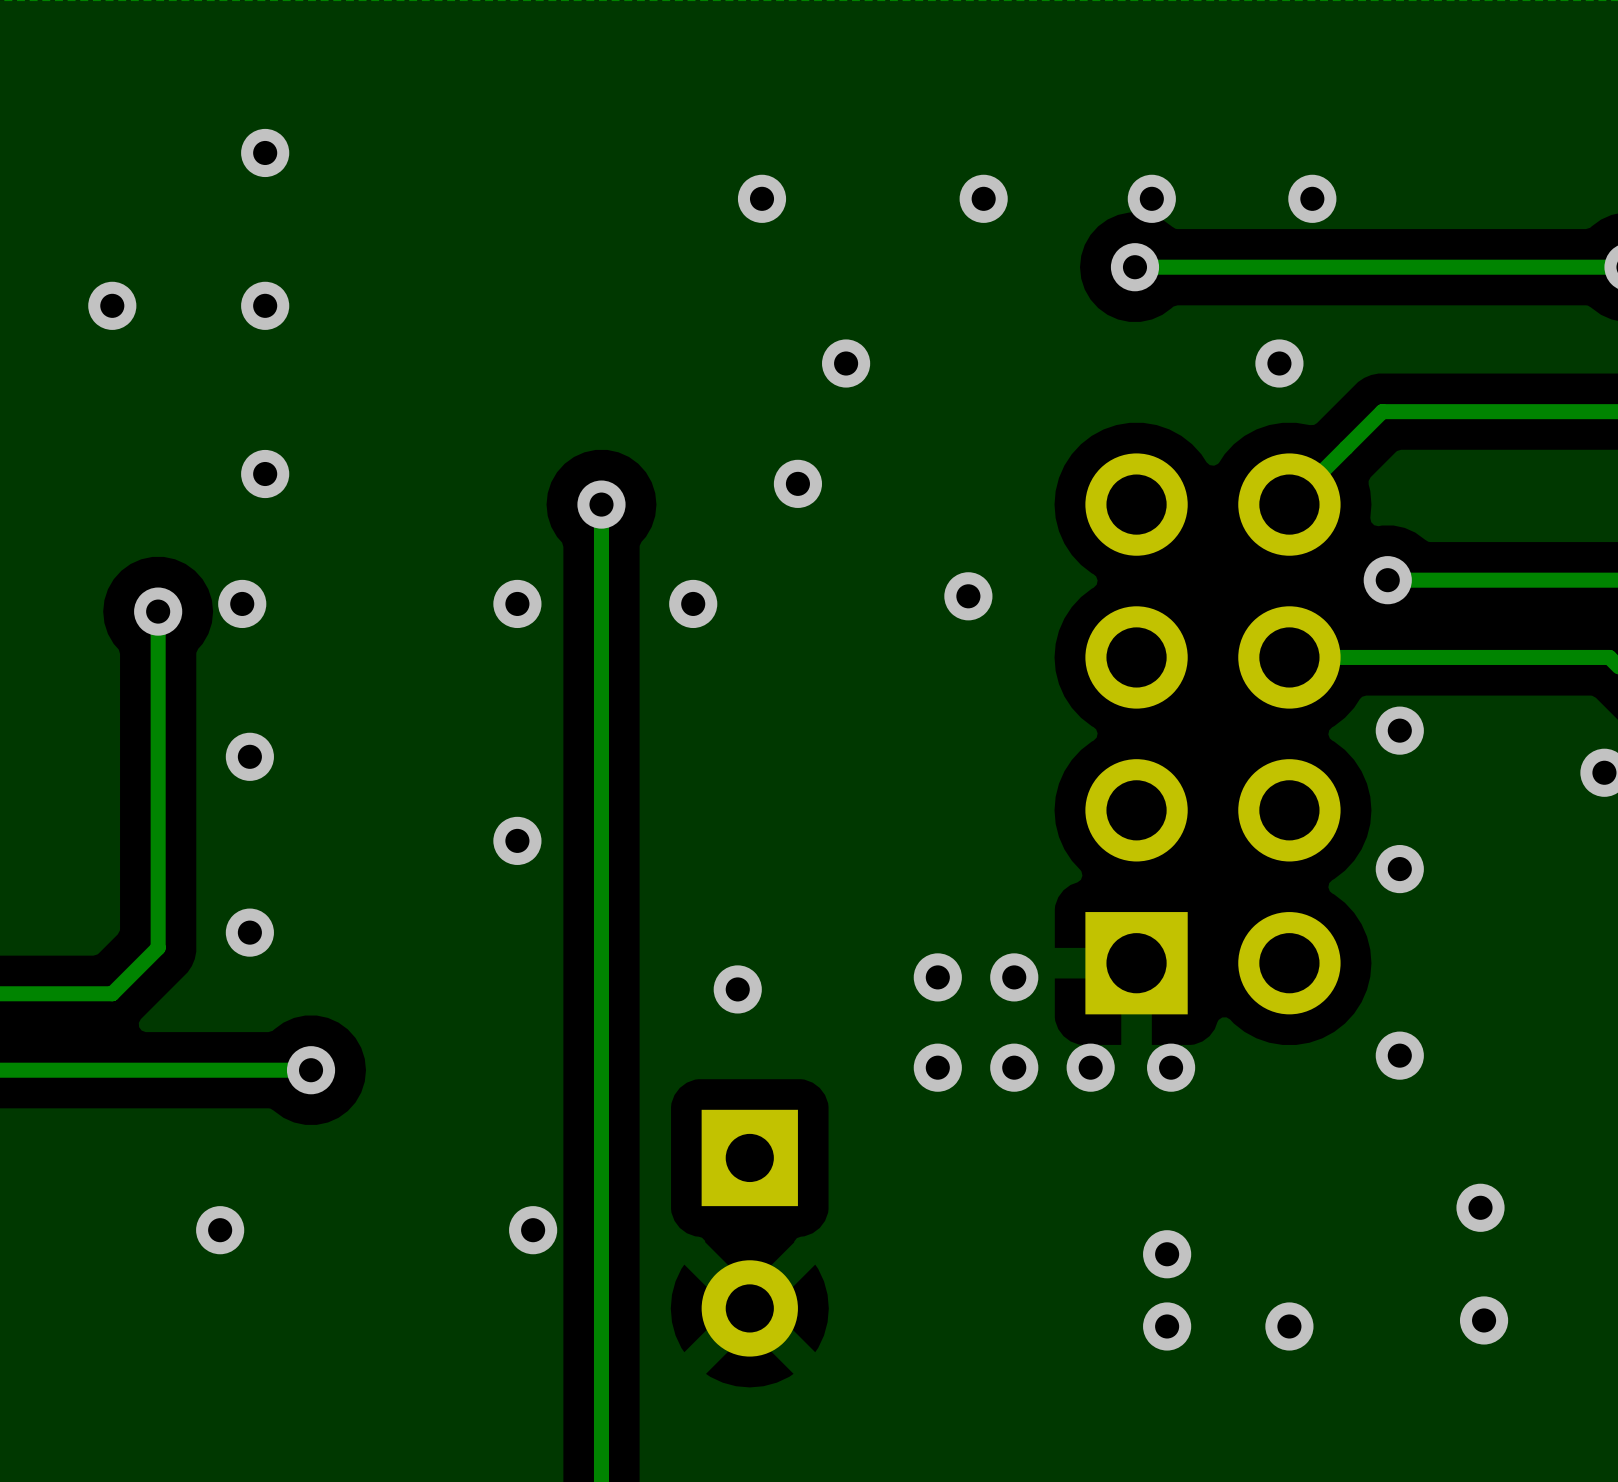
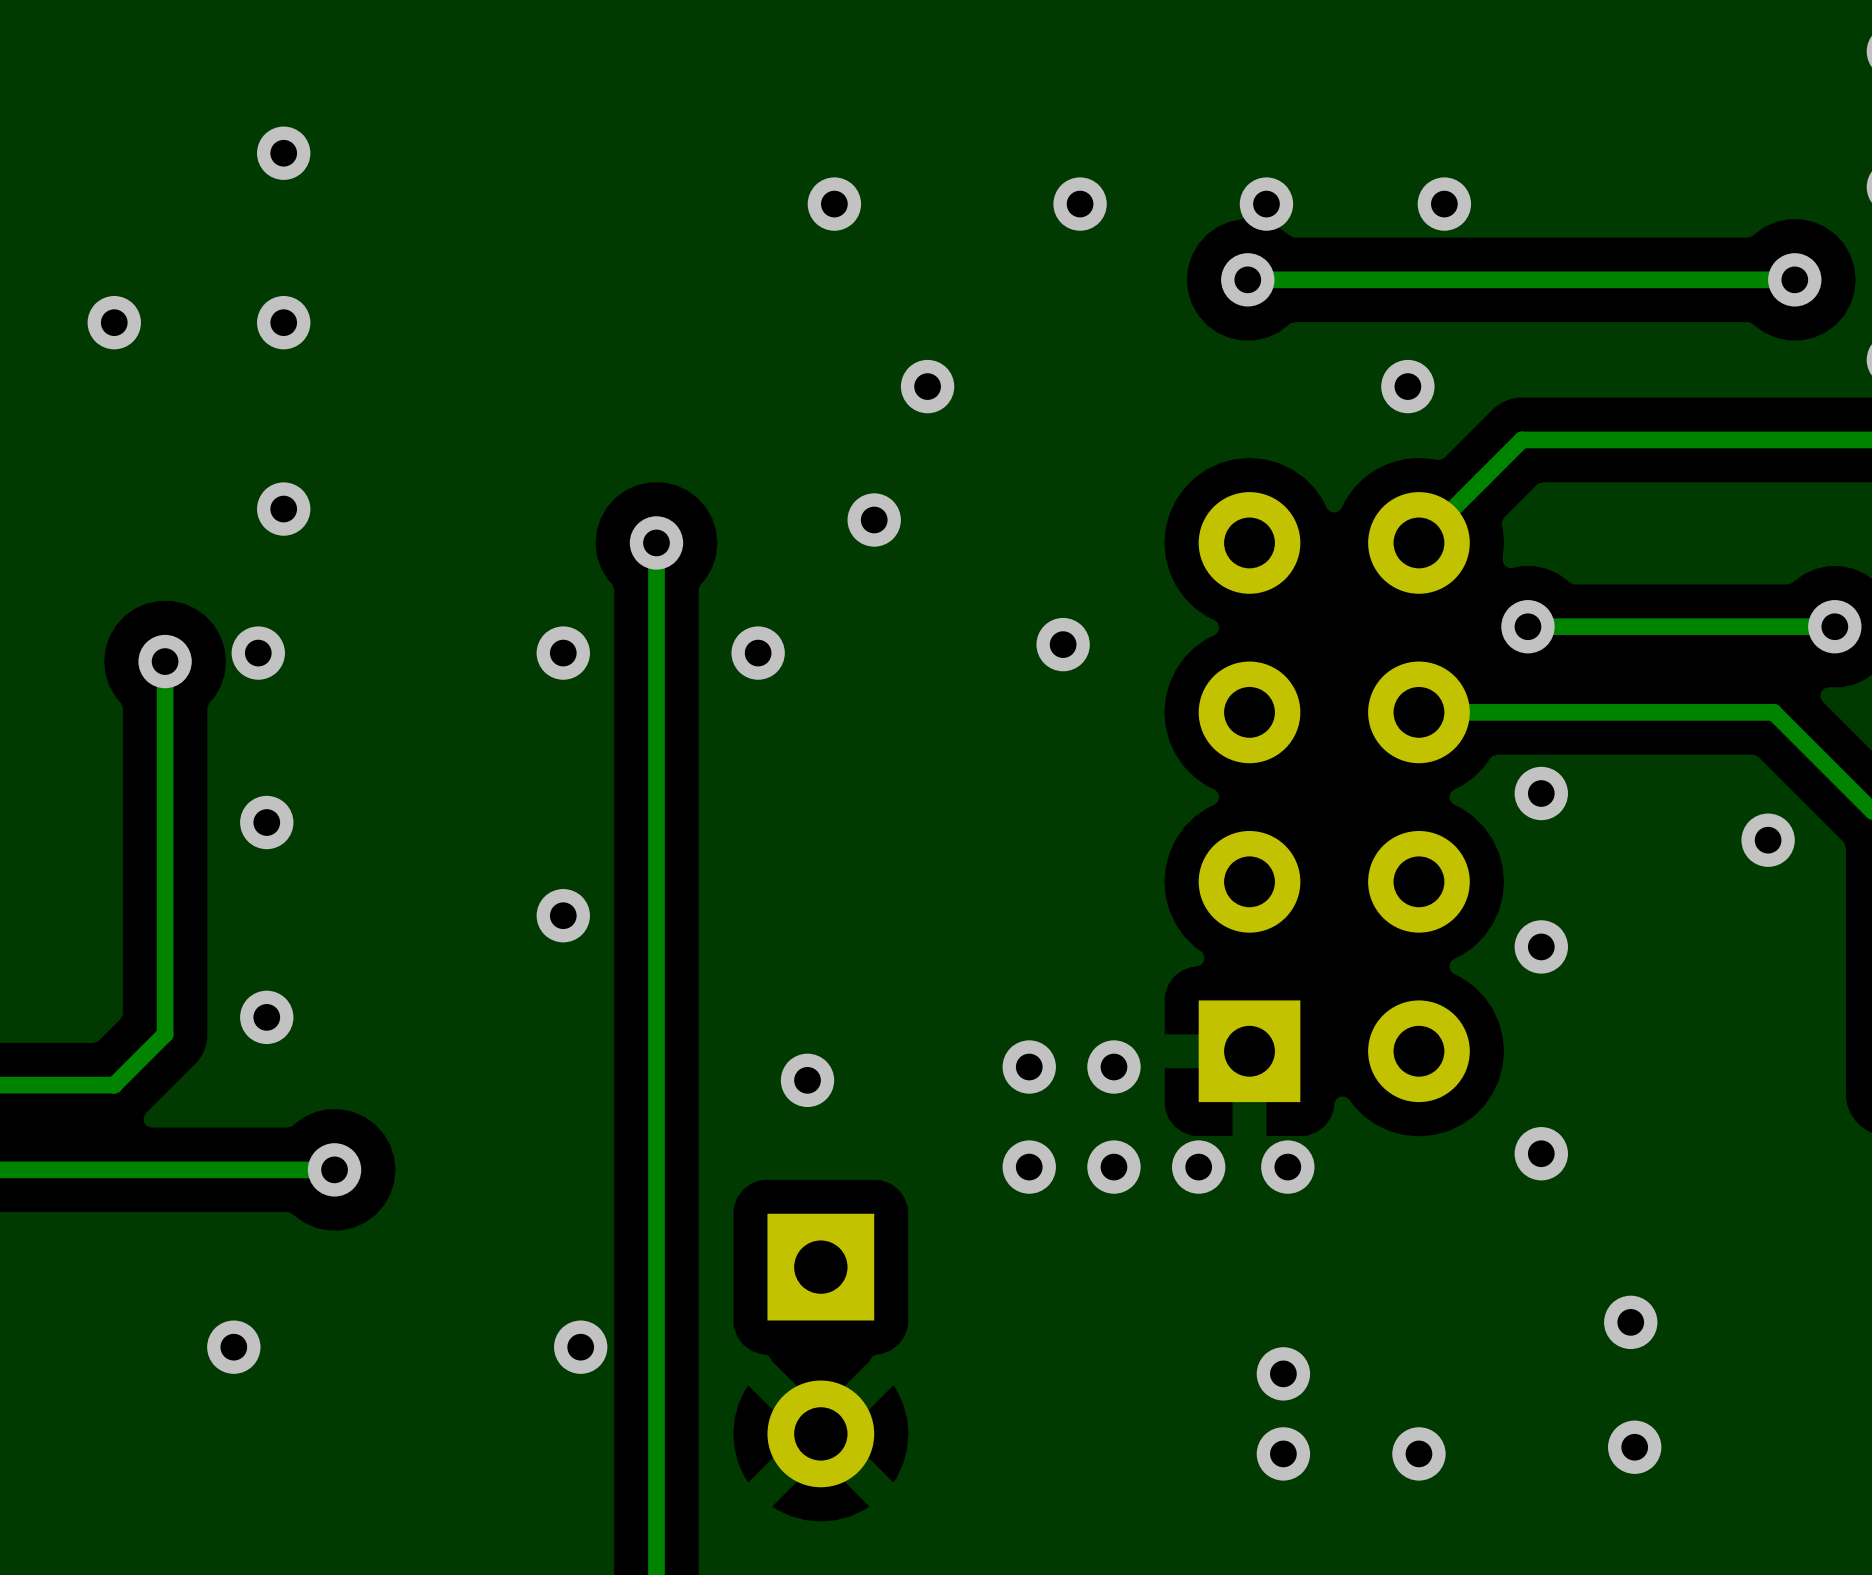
part footprint: [1085, 453, 1341, 1015] -> [1198, 492, 1470, 1103]

